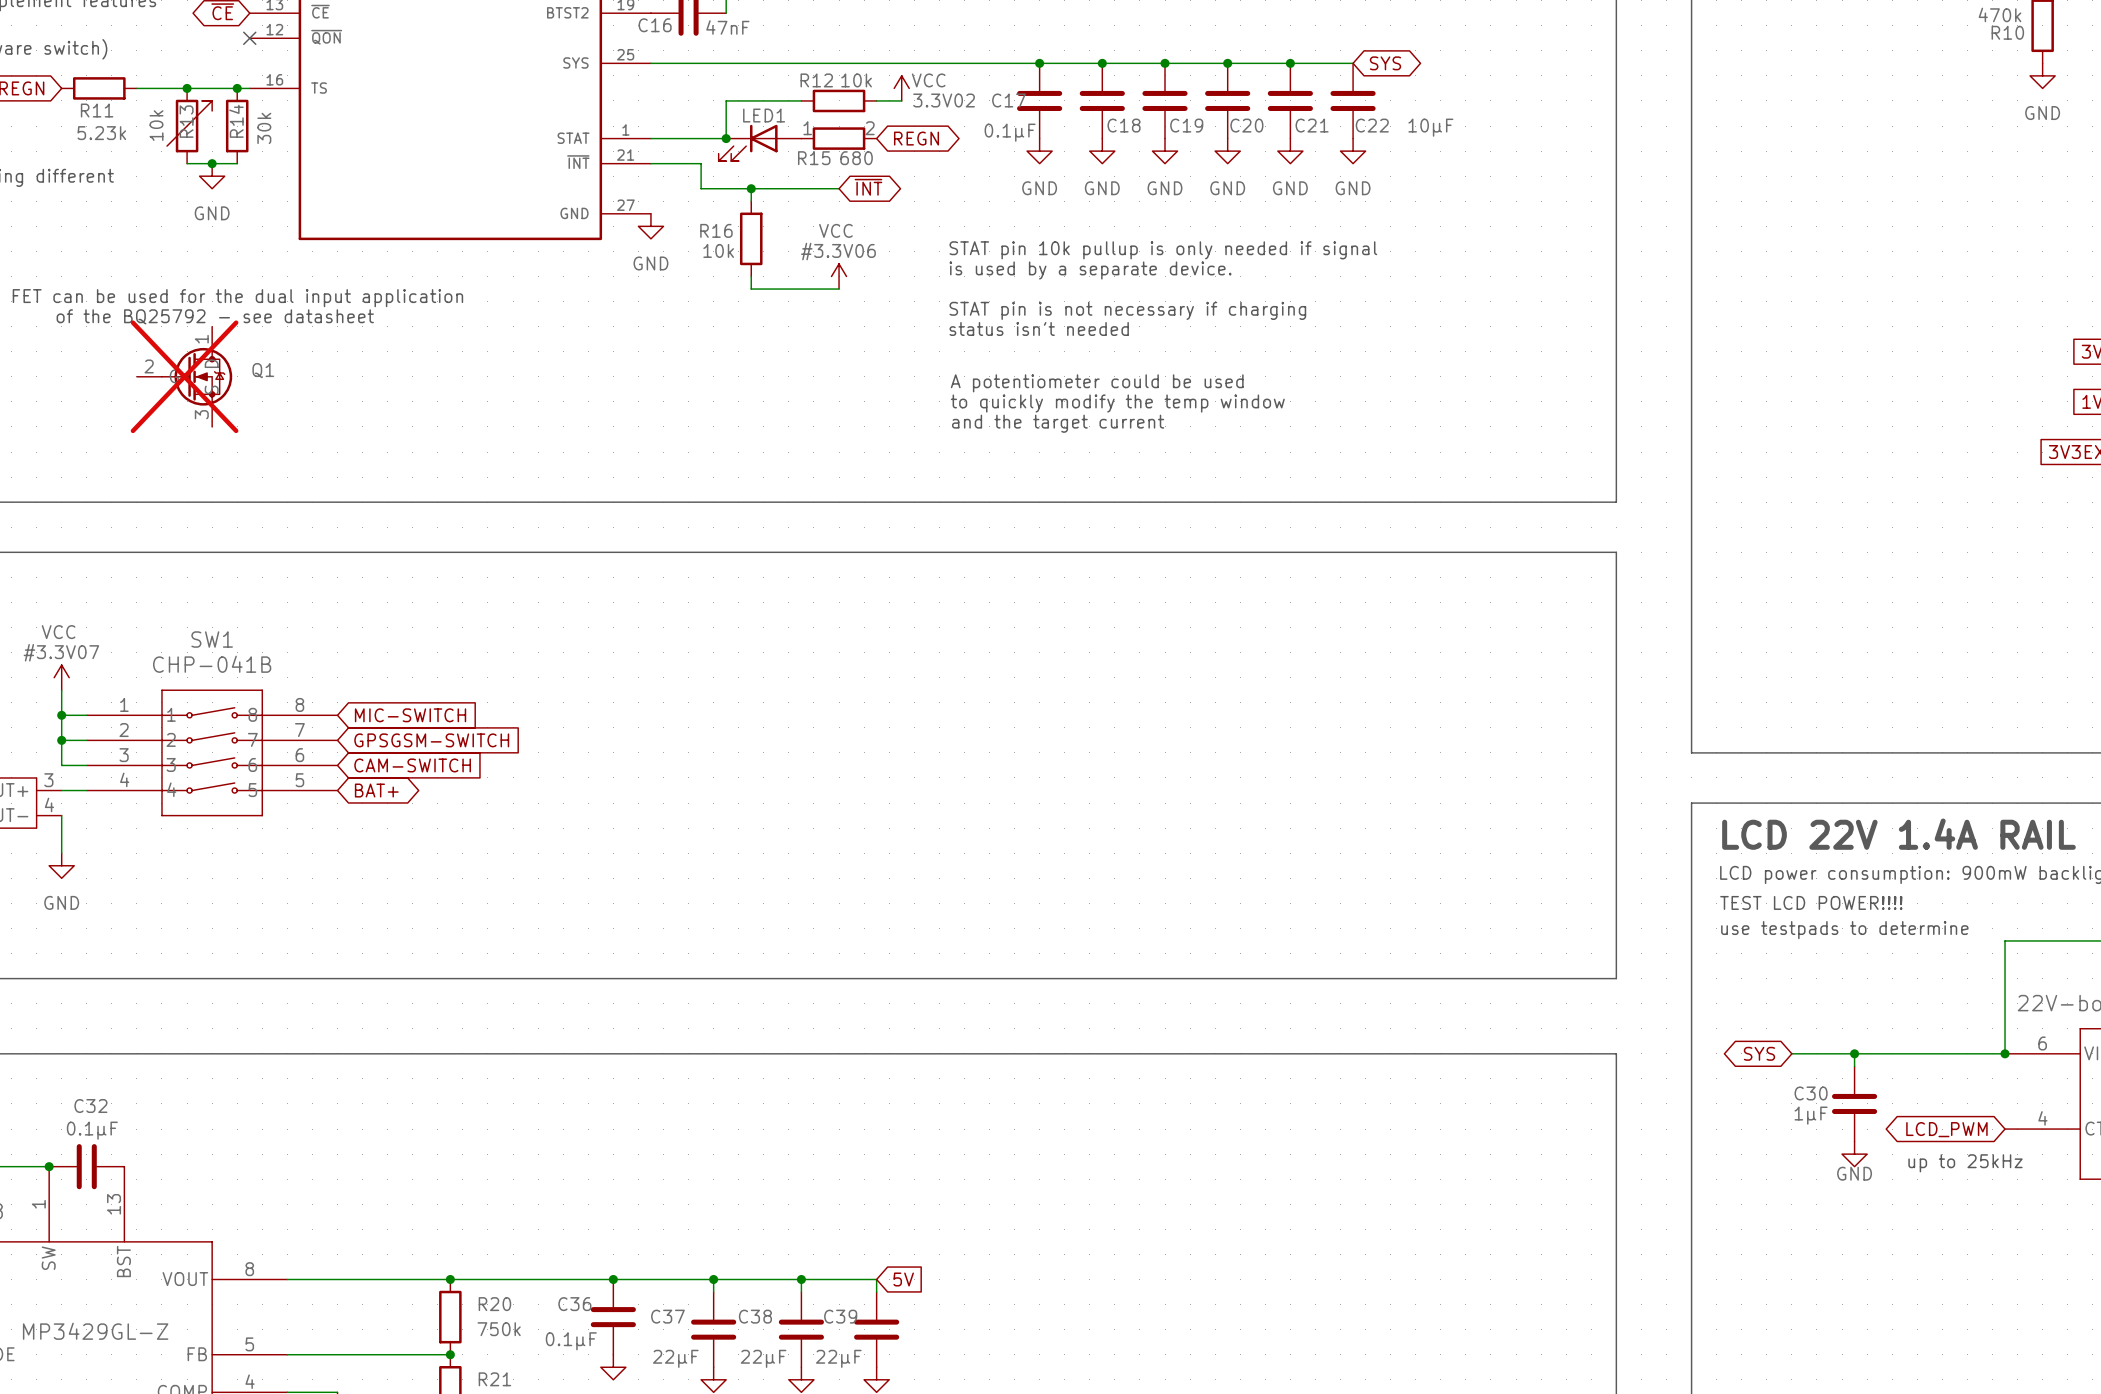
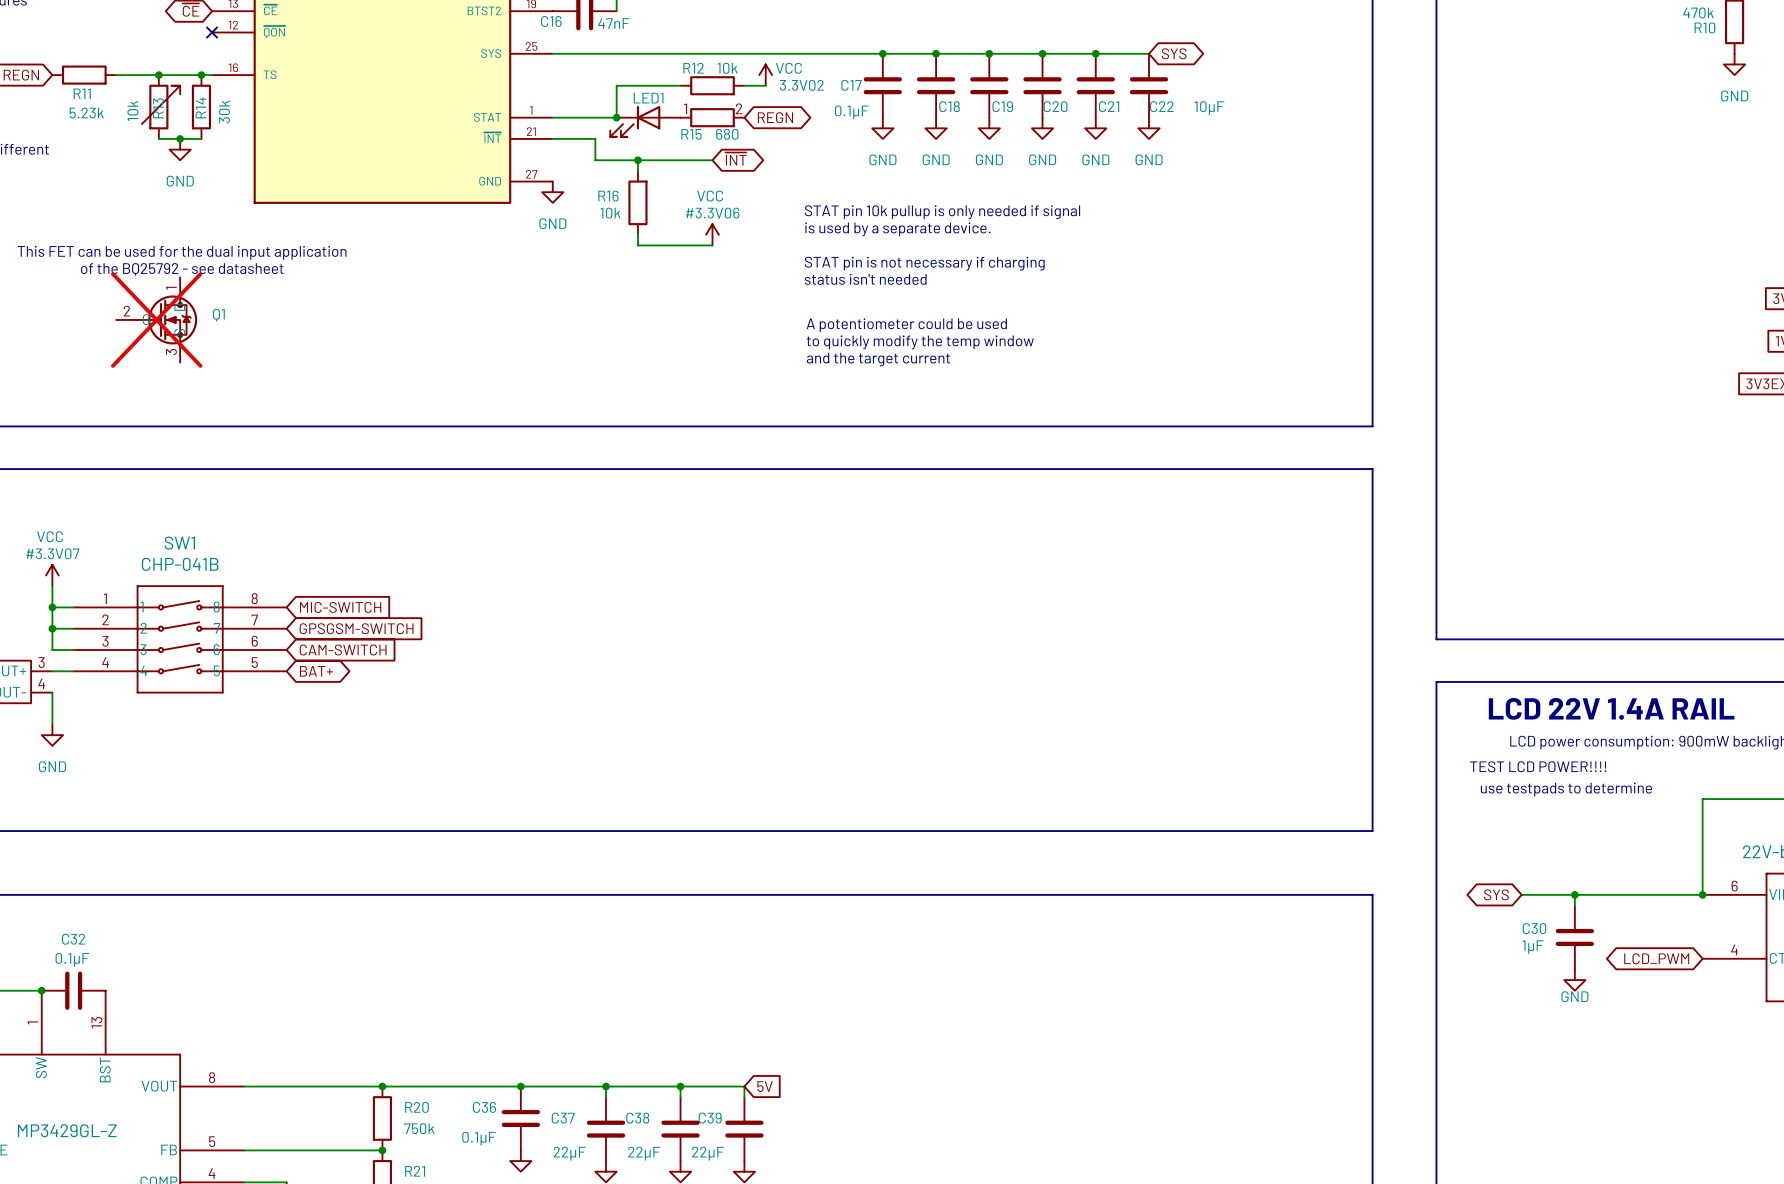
text: up to 25kHz (1965, 1163) -> none

